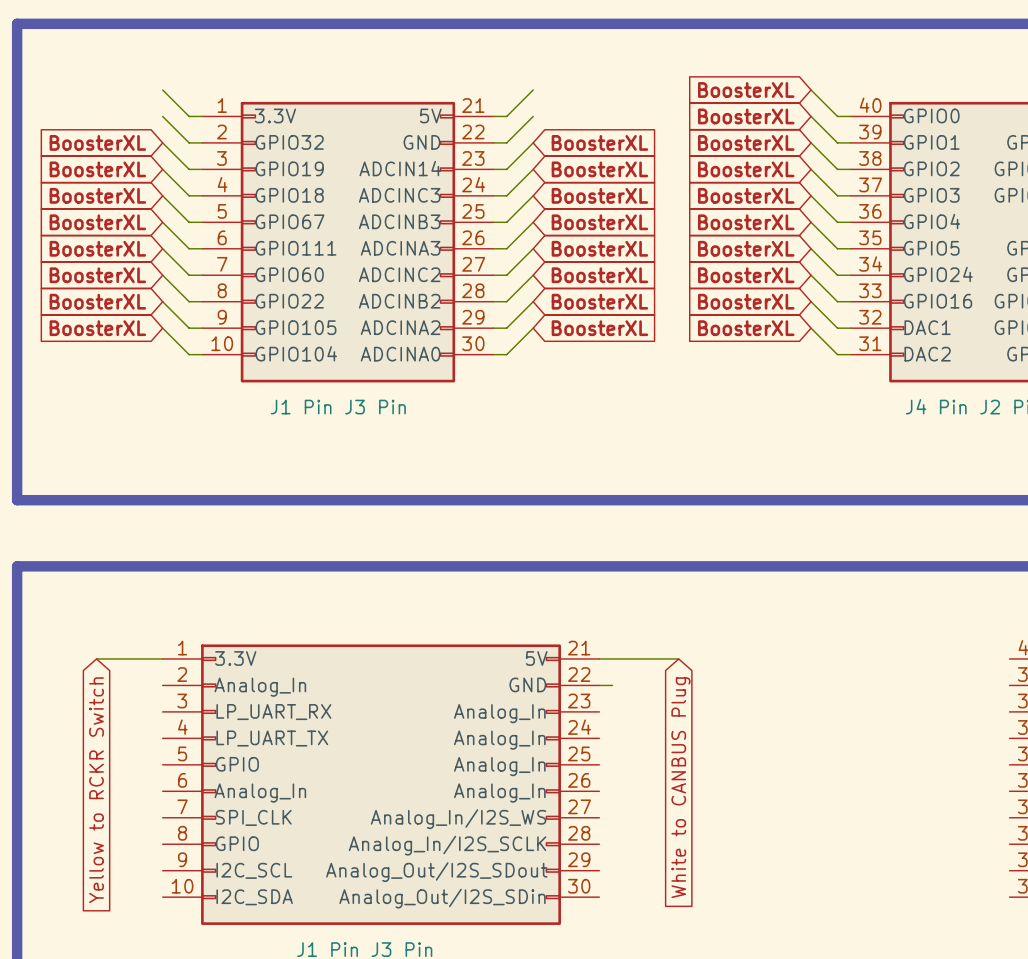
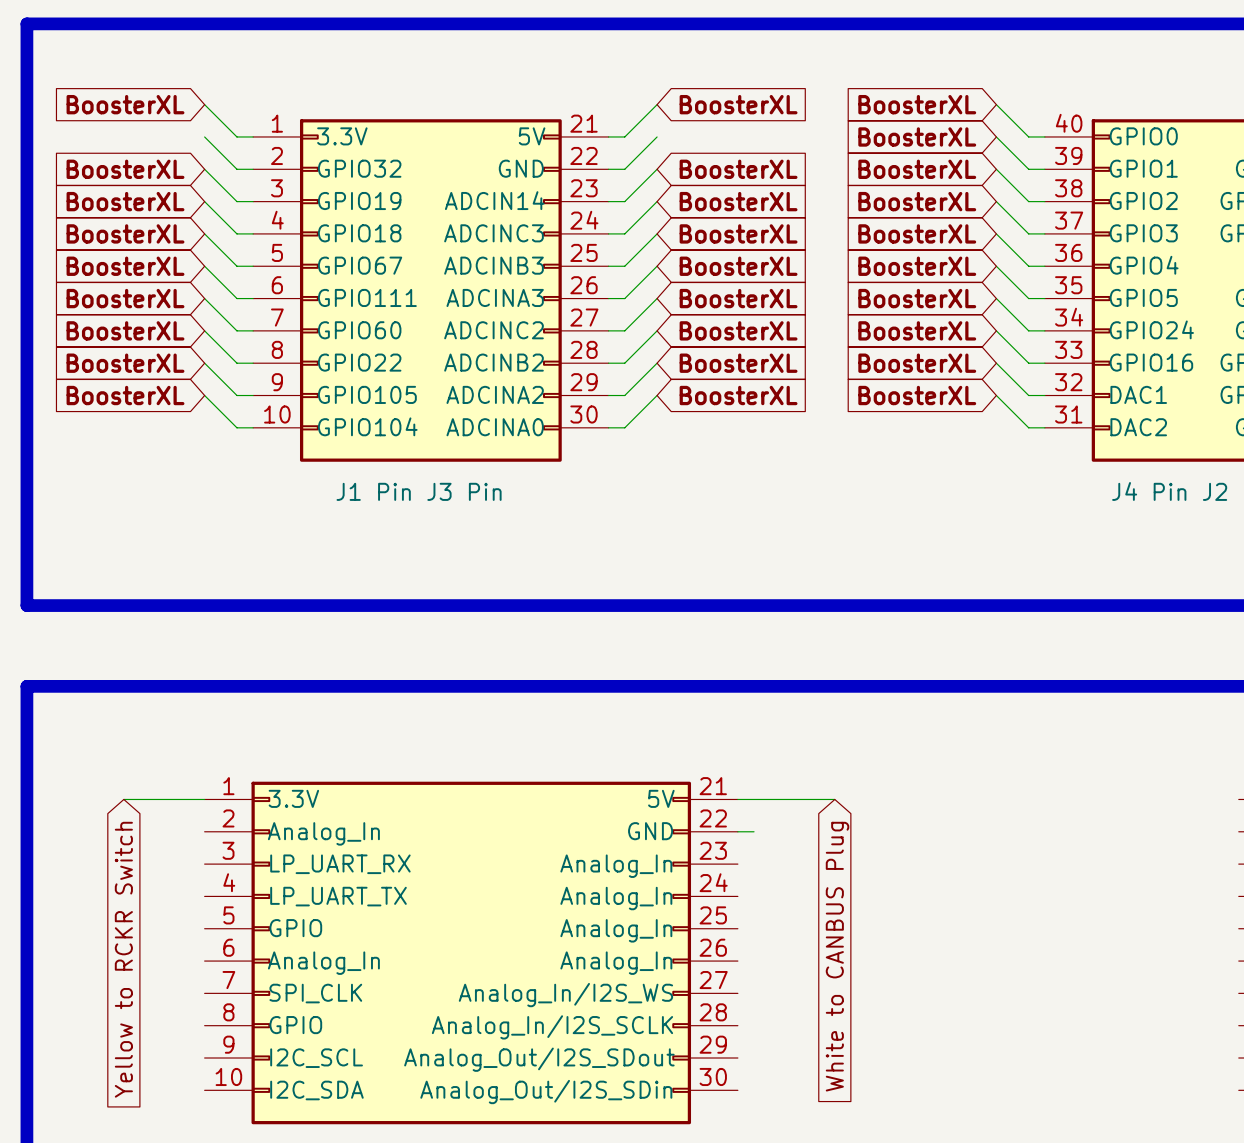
global label: none -> BoosterXL (125, 104)
global label: none -> BoosterXL (738, 104)

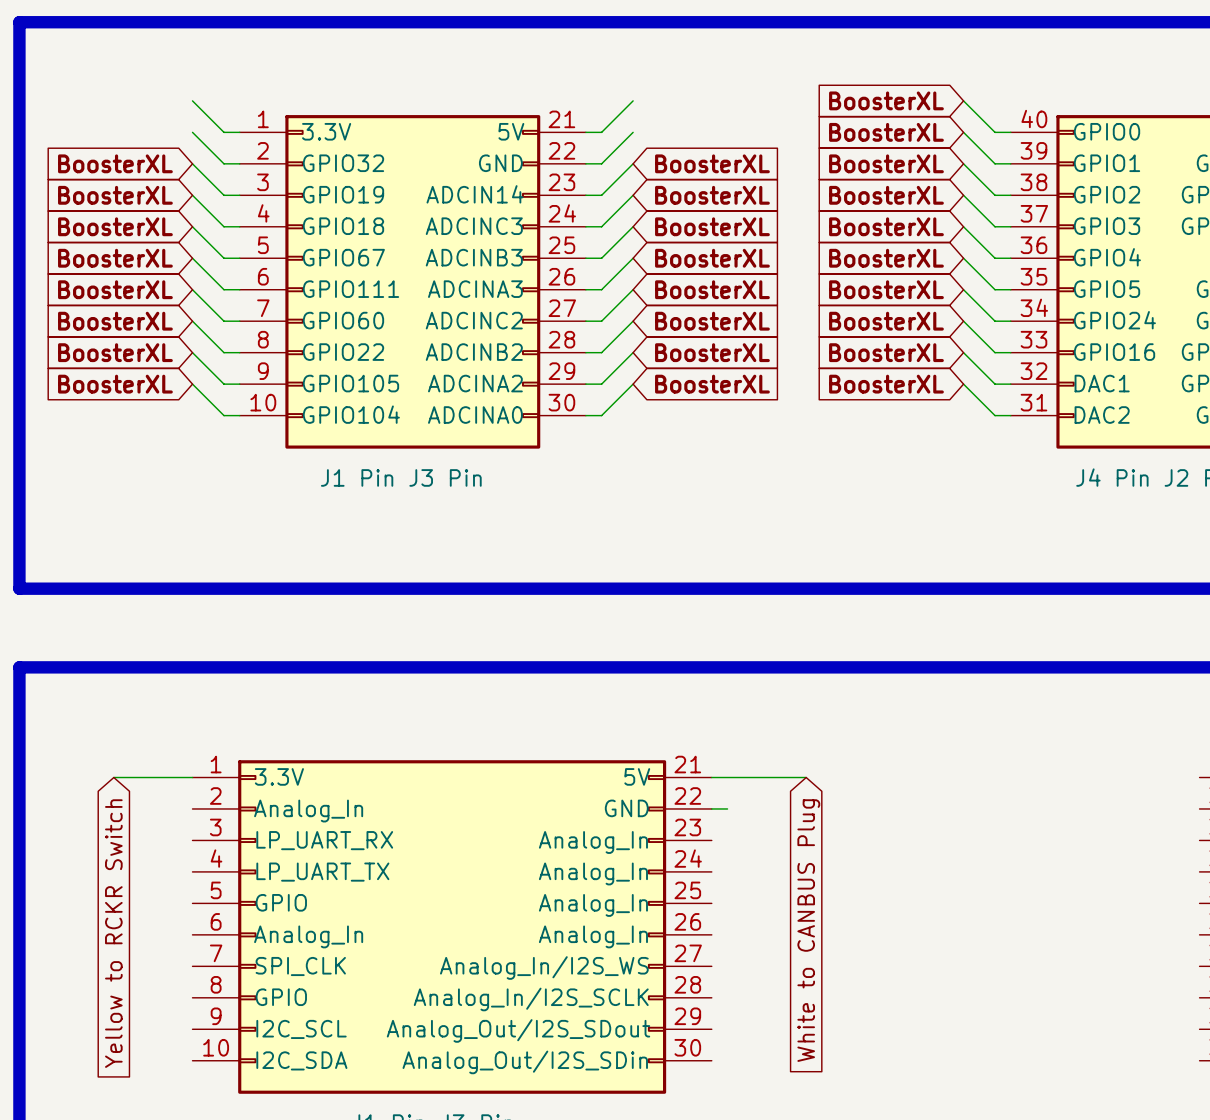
global label: BoosterXL (125, 104) -> none
global label: BoosterXL (738, 104) -> none

